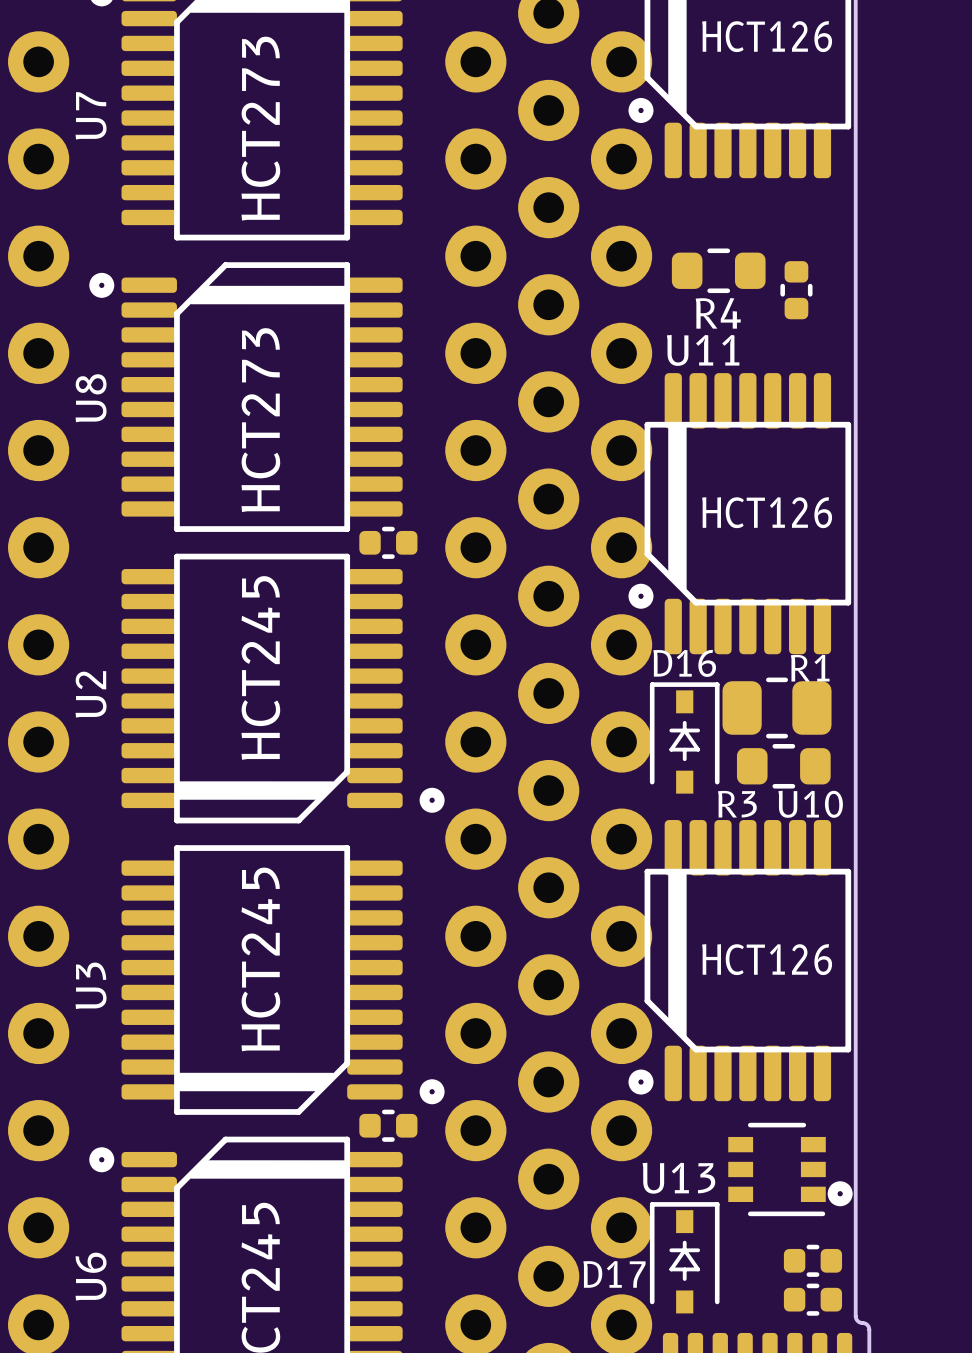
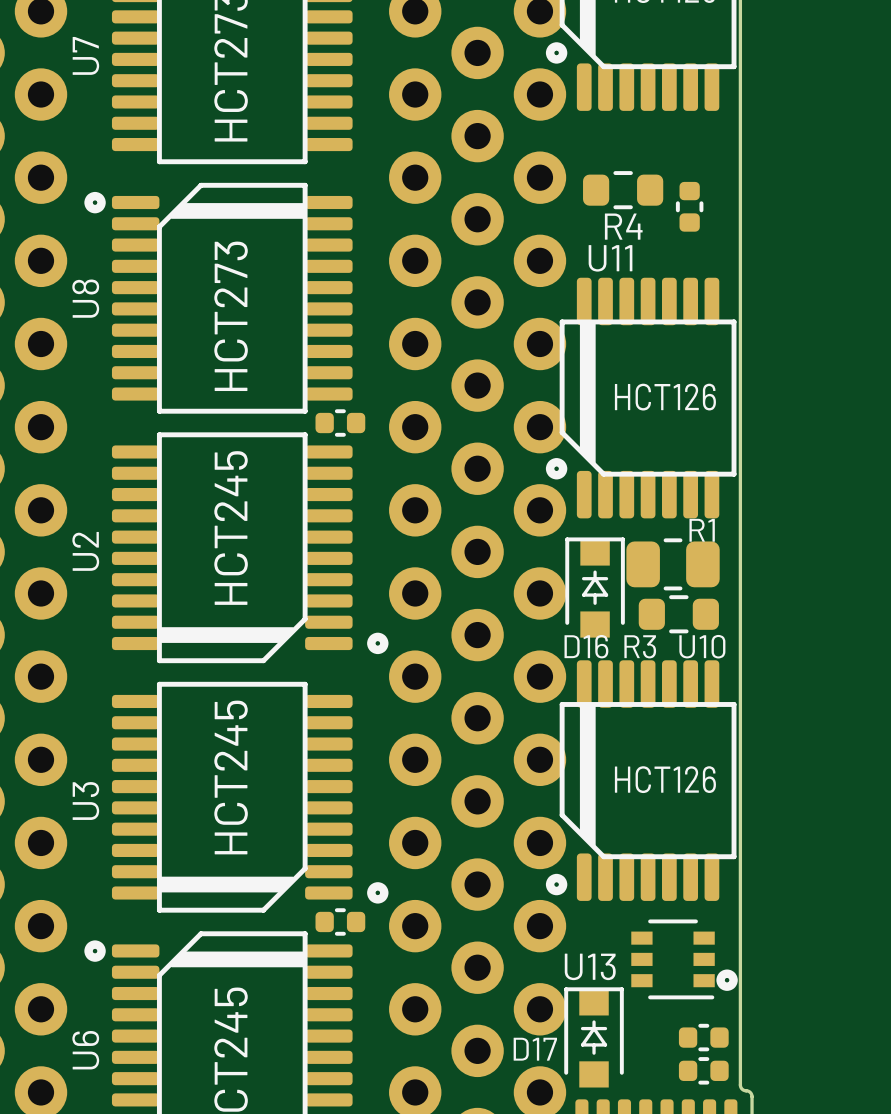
D16 name position: D16 (684, 663) -> D16 (586, 646)
D16 footprint: [649, 682, 720, 794] -> [565, 537, 625, 638]
D17 footprint: [649, 1202, 720, 1314] -> [564, 987, 624, 1088]

